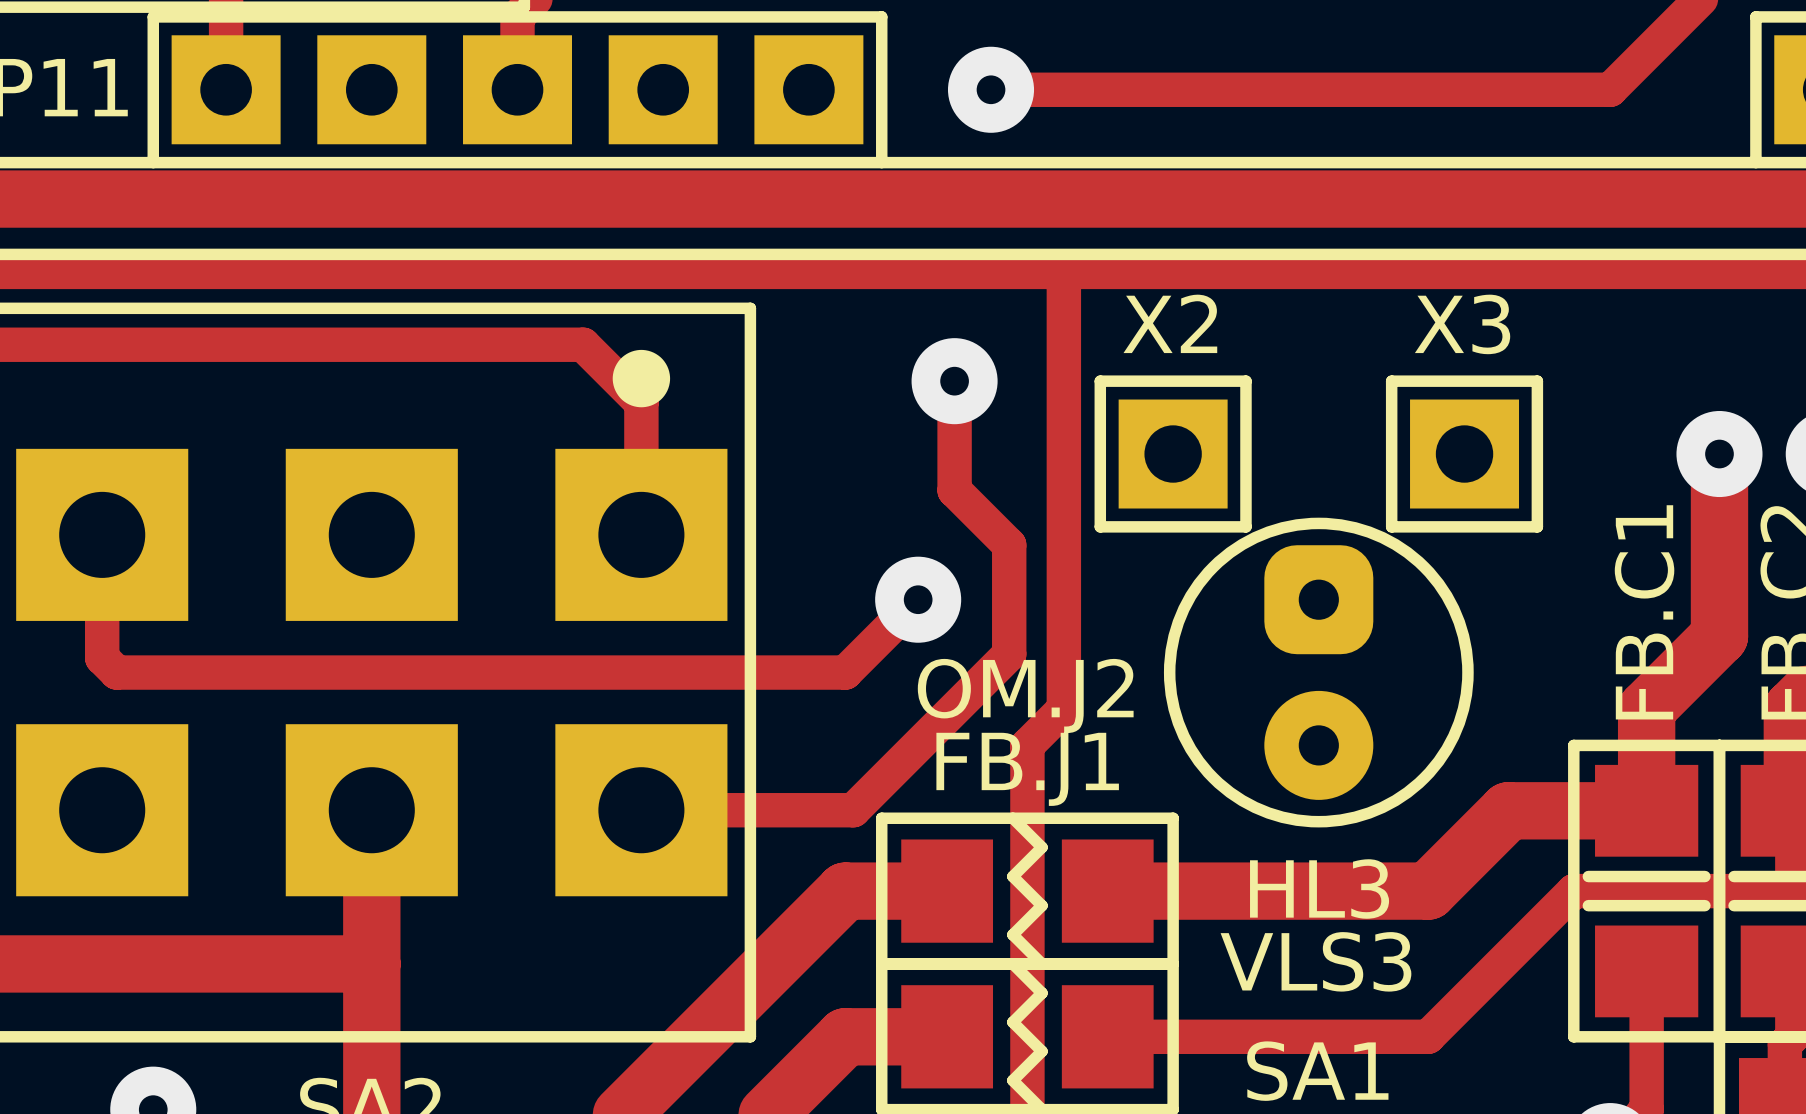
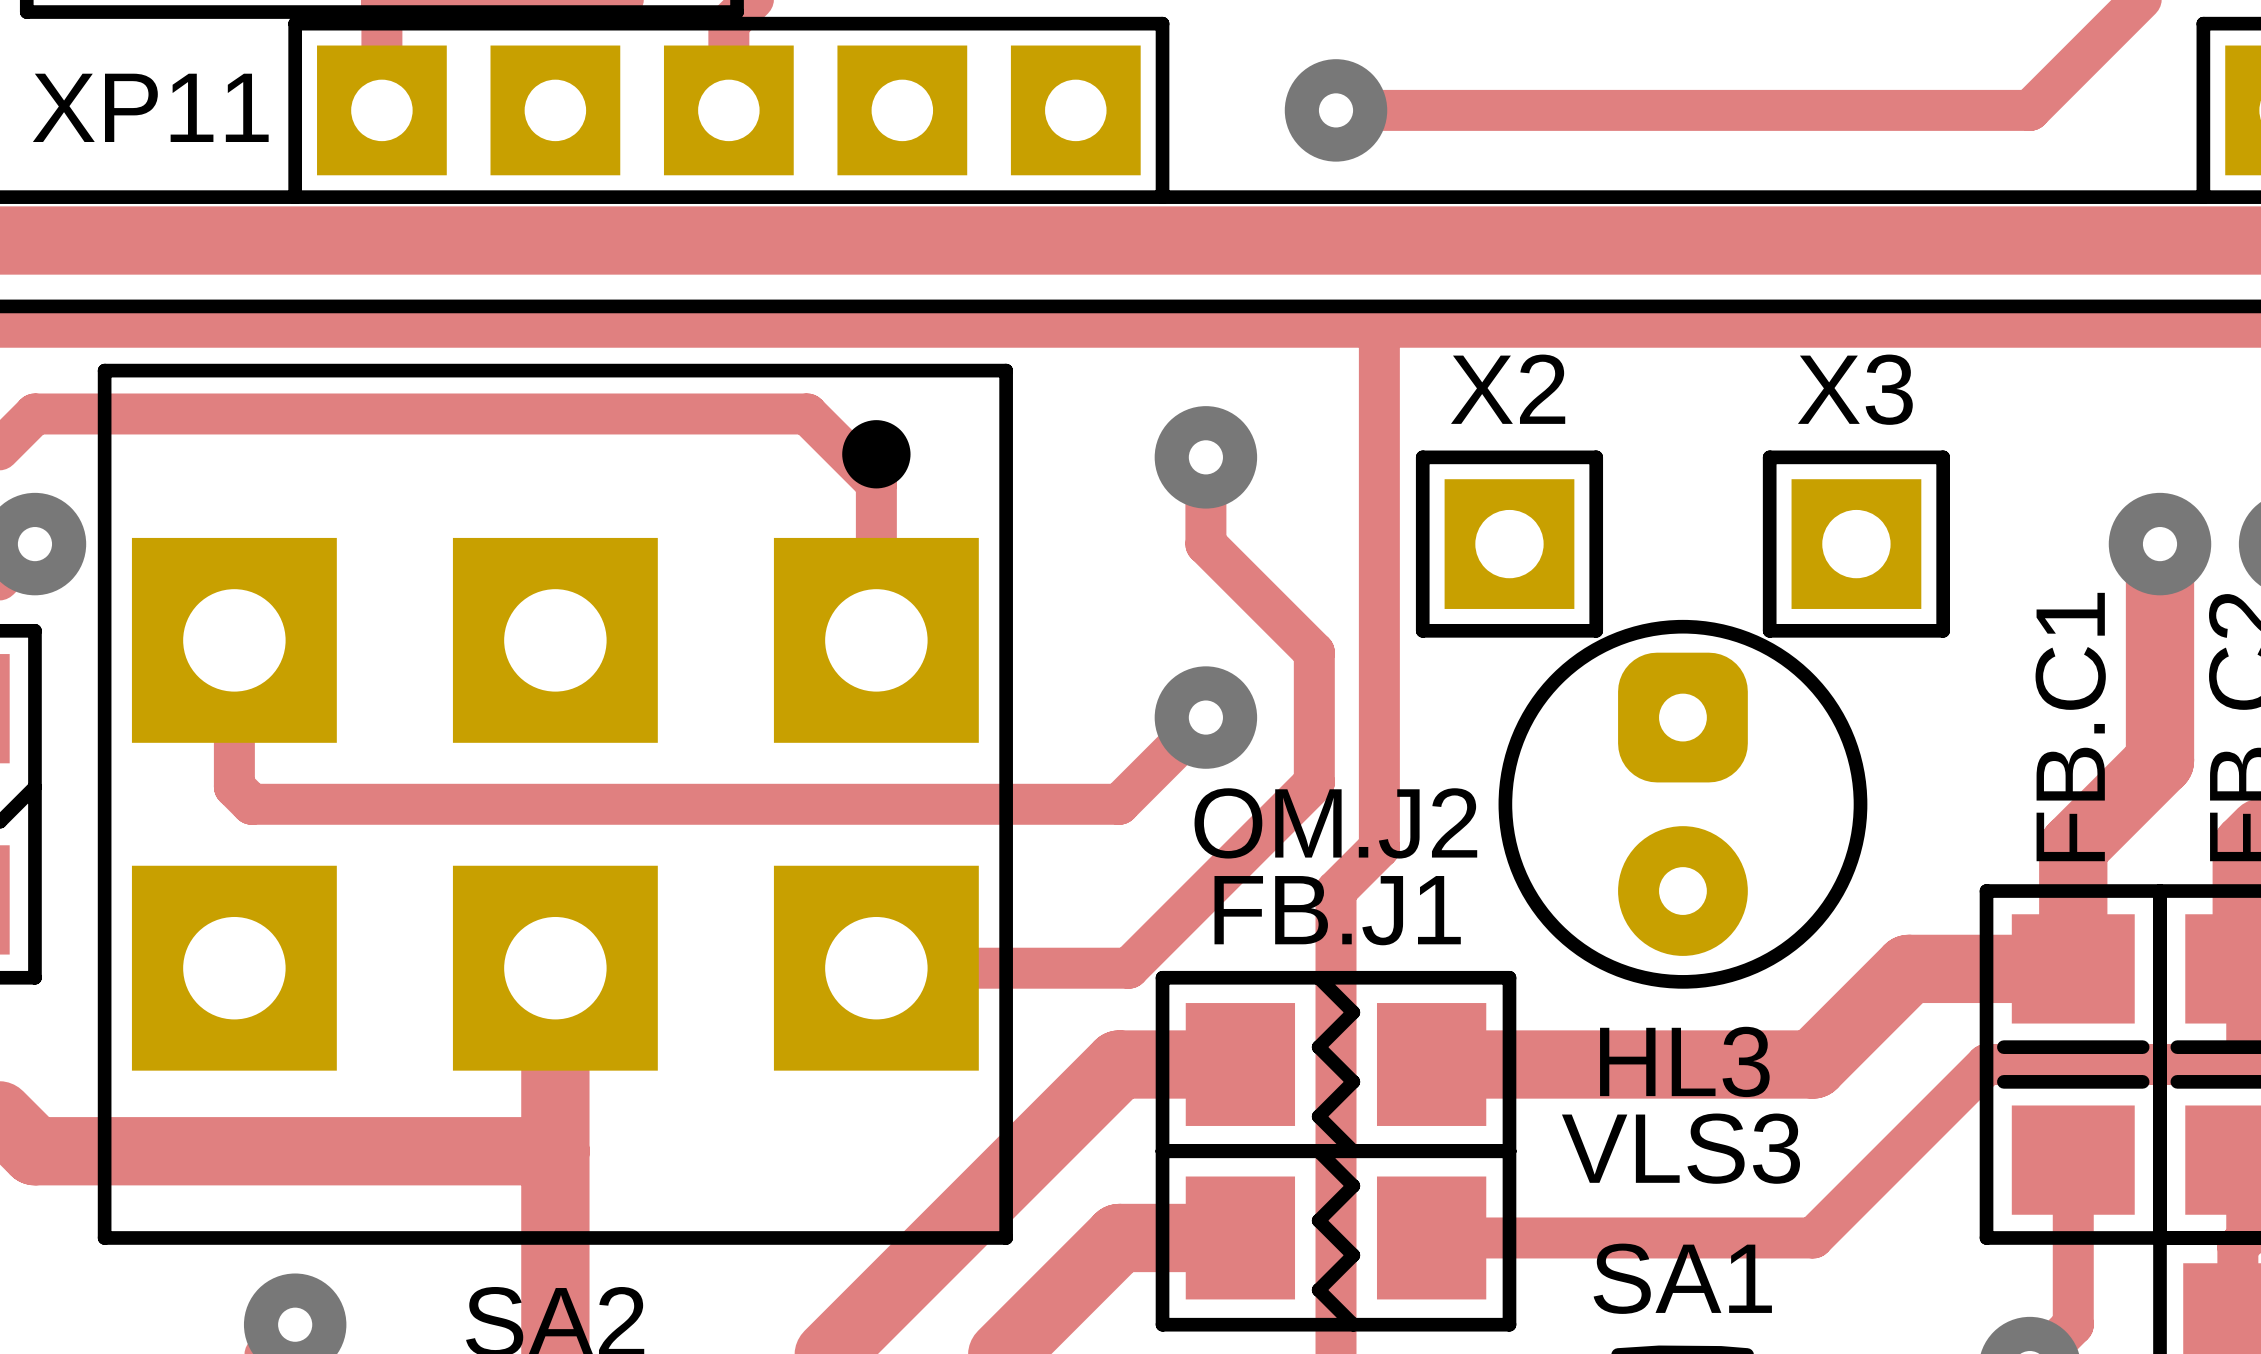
via position: (991, 89) -> (1336, 110)
track: (954, 381) (954, 490) -> (1205, 457) (1205, 544) (1249, 587)
via position: (954, 381) -> (1205, 457)

